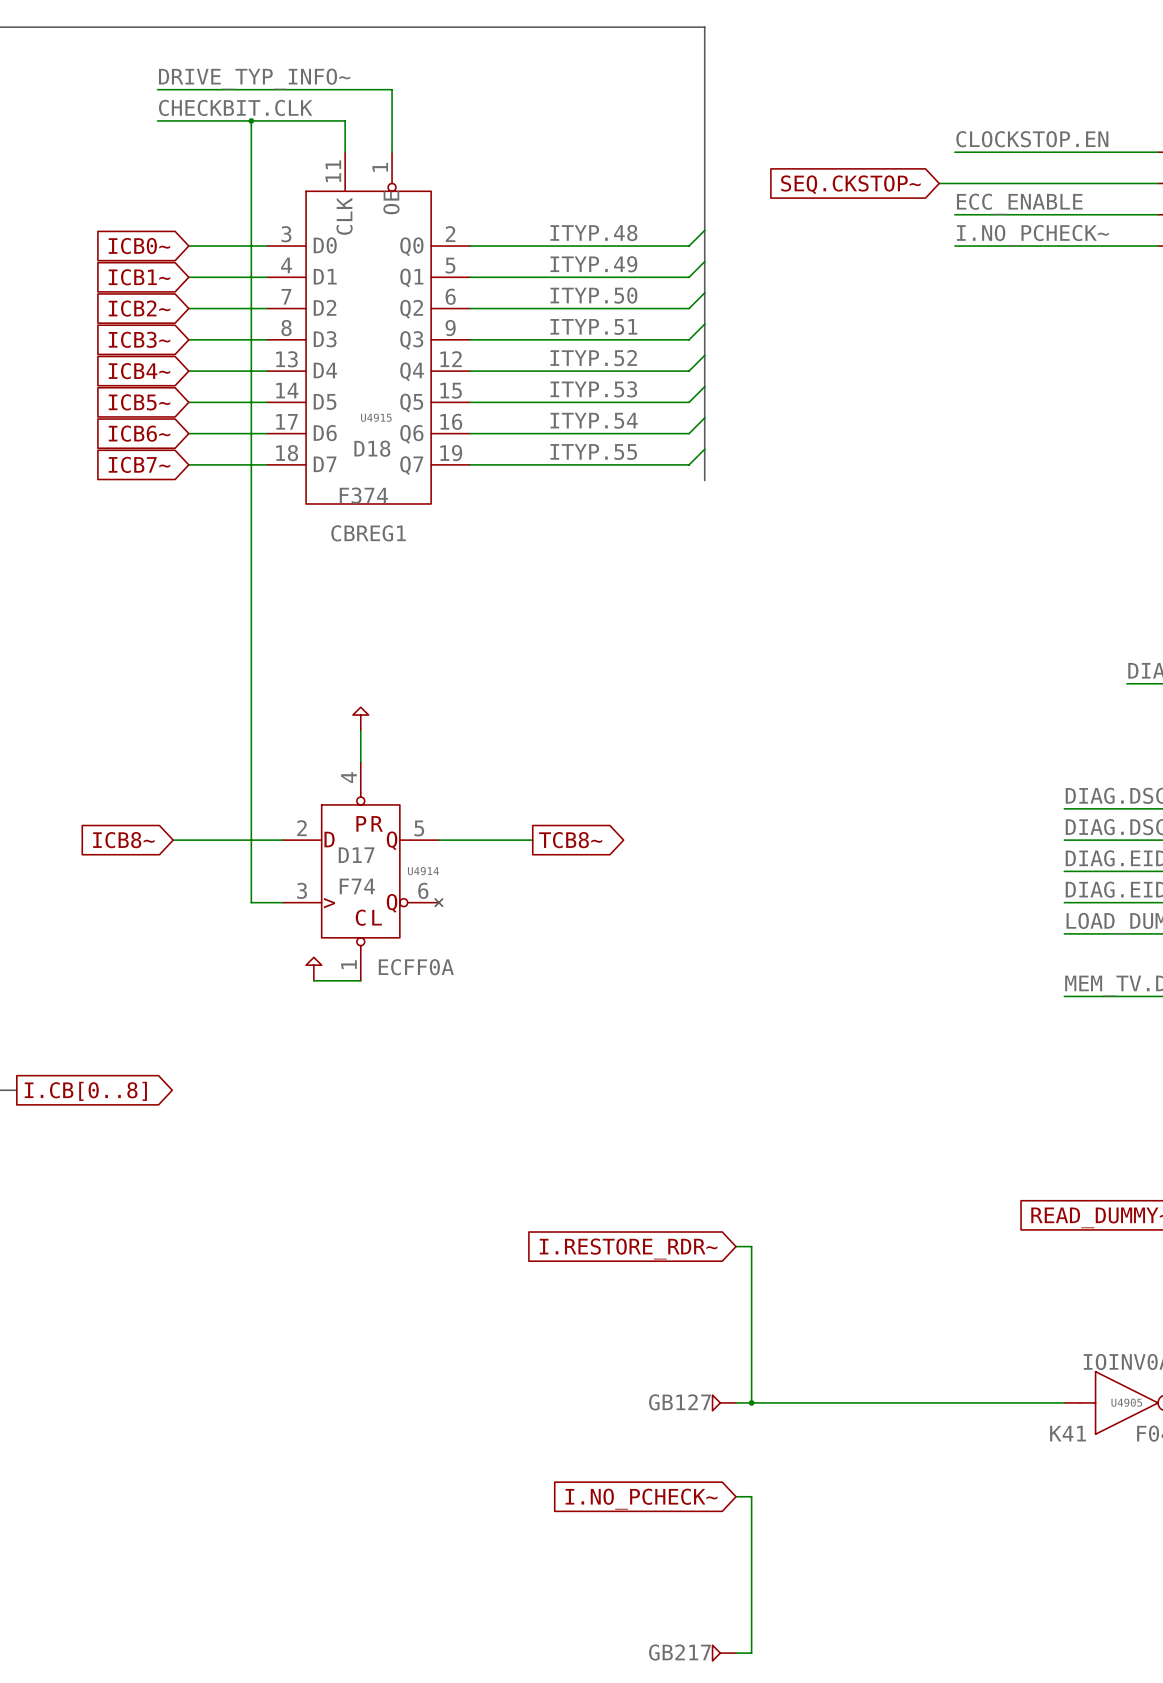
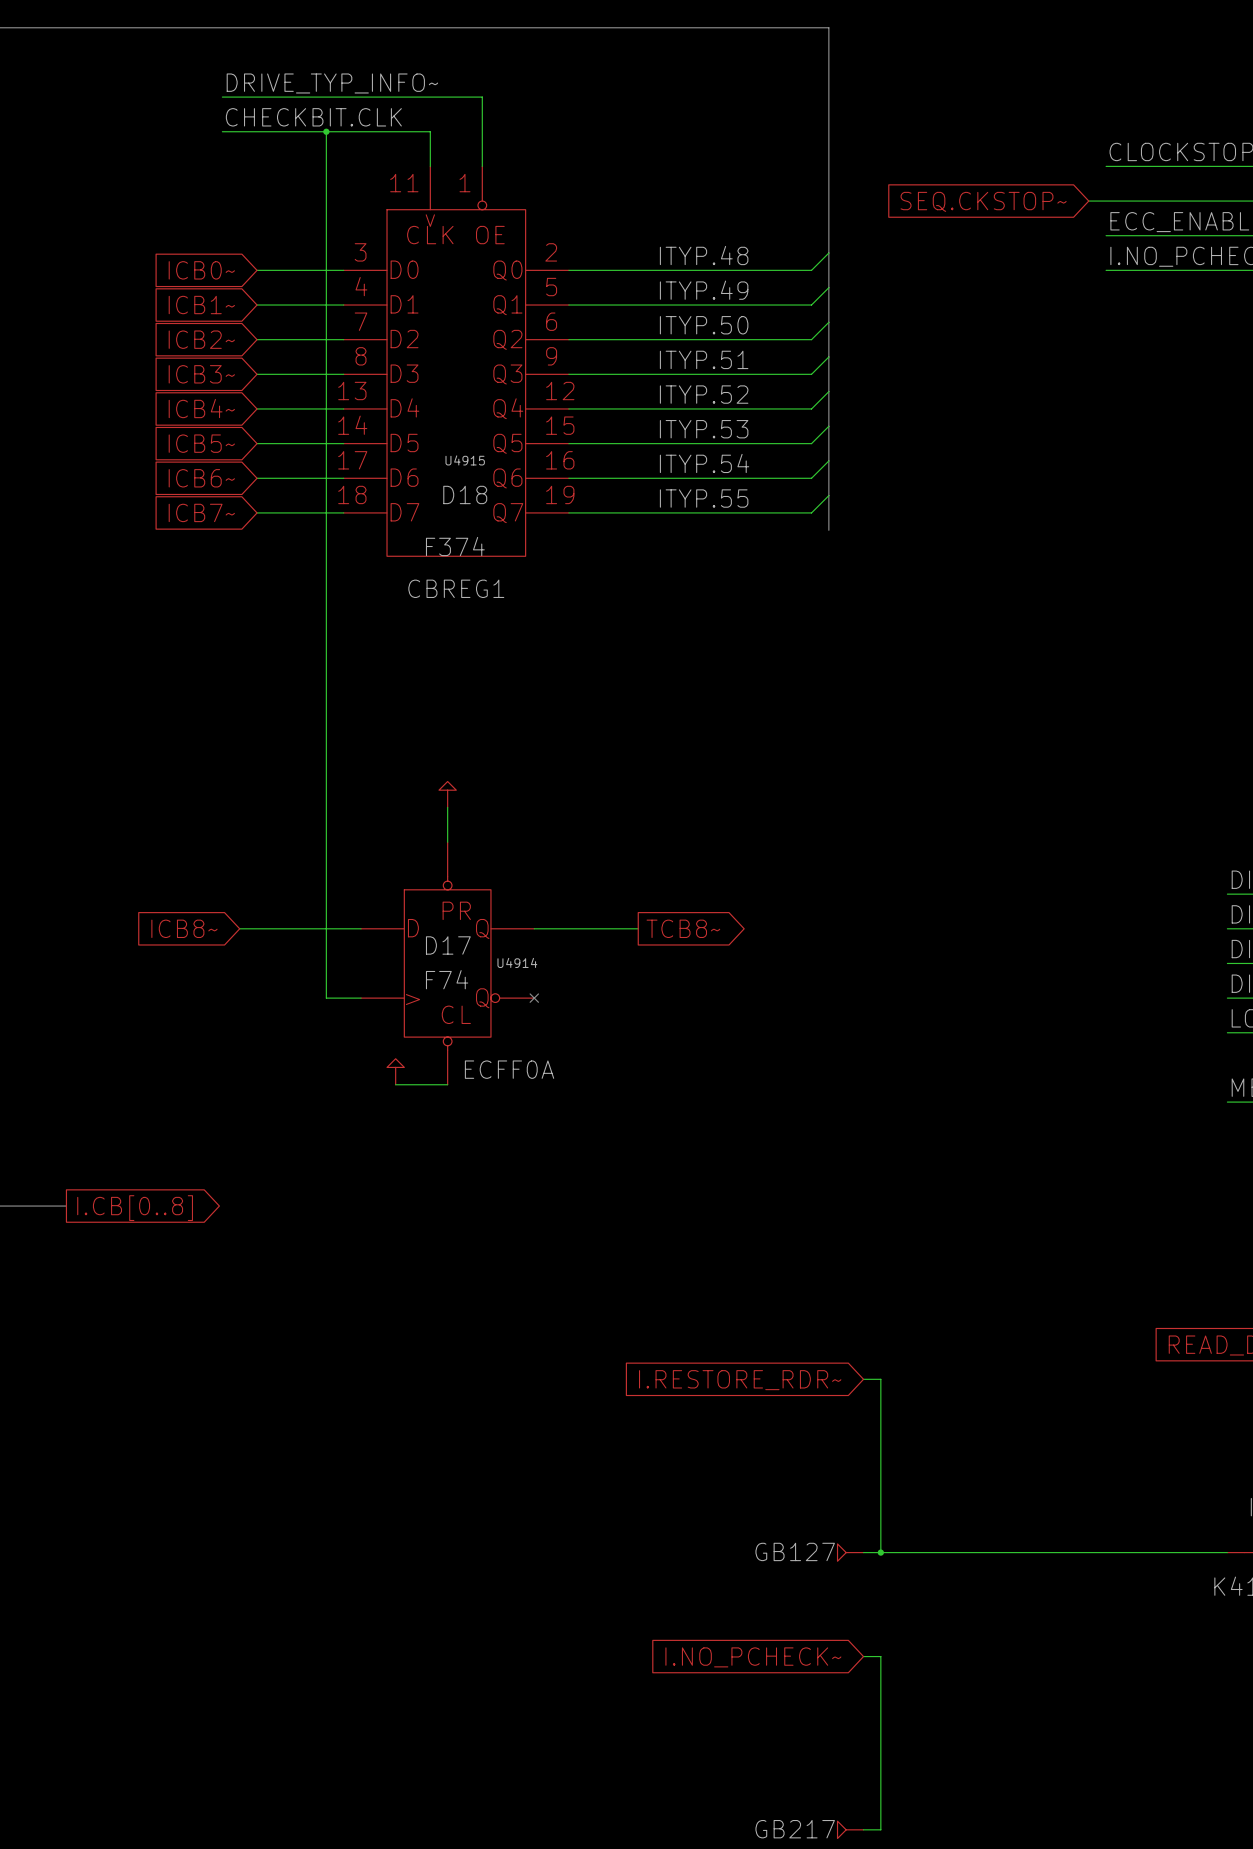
U4915 symbol: [266, 152, 471, 504] -> [343, 166, 569, 557]
U4914 pin number: 4 (348, 777) -> none
U4914 pin number: 2 (302, 828) -> none
U4914 pin number: 5 (419, 828) -> none
U4914 pin number: 3 (302, 890) -> none
U4914 pin number: 6 (423, 890) -> none
U4914 pin number: 1 (348, 964) -> none

